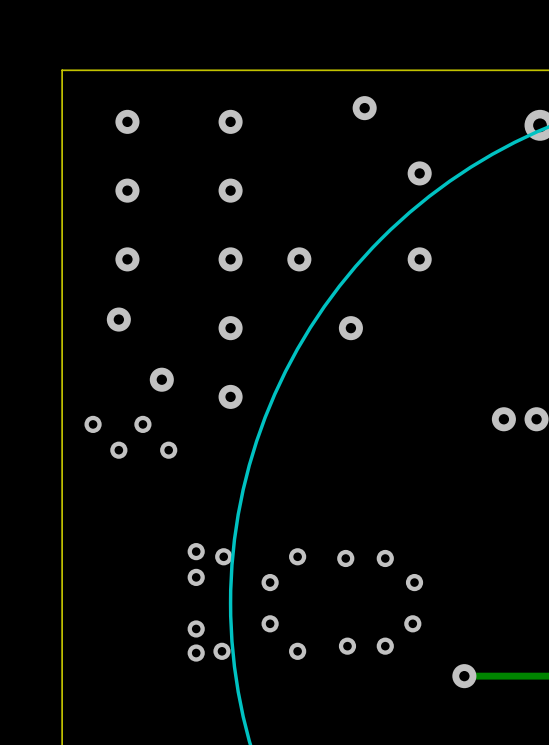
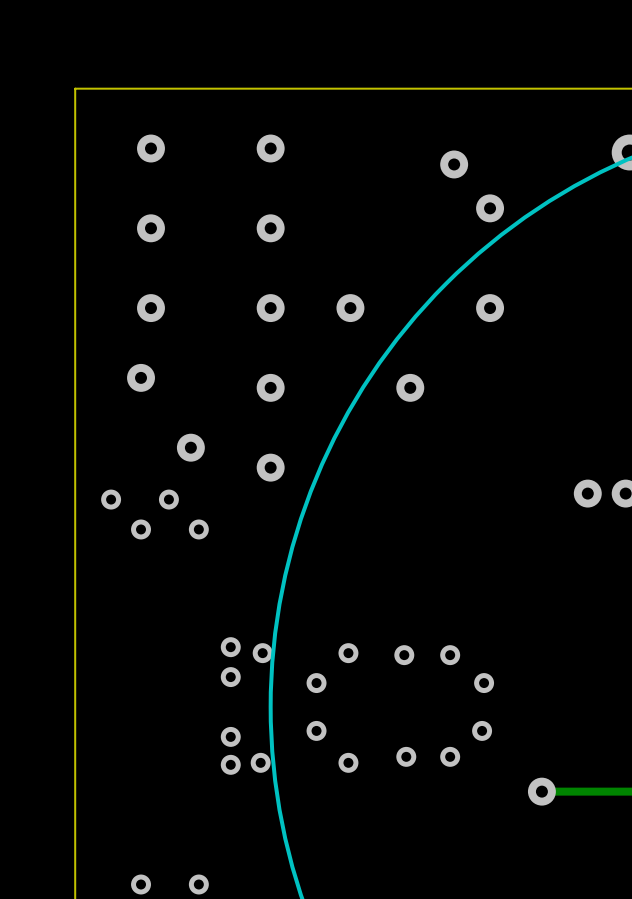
via position: (364, 108) -> (454, 164)

